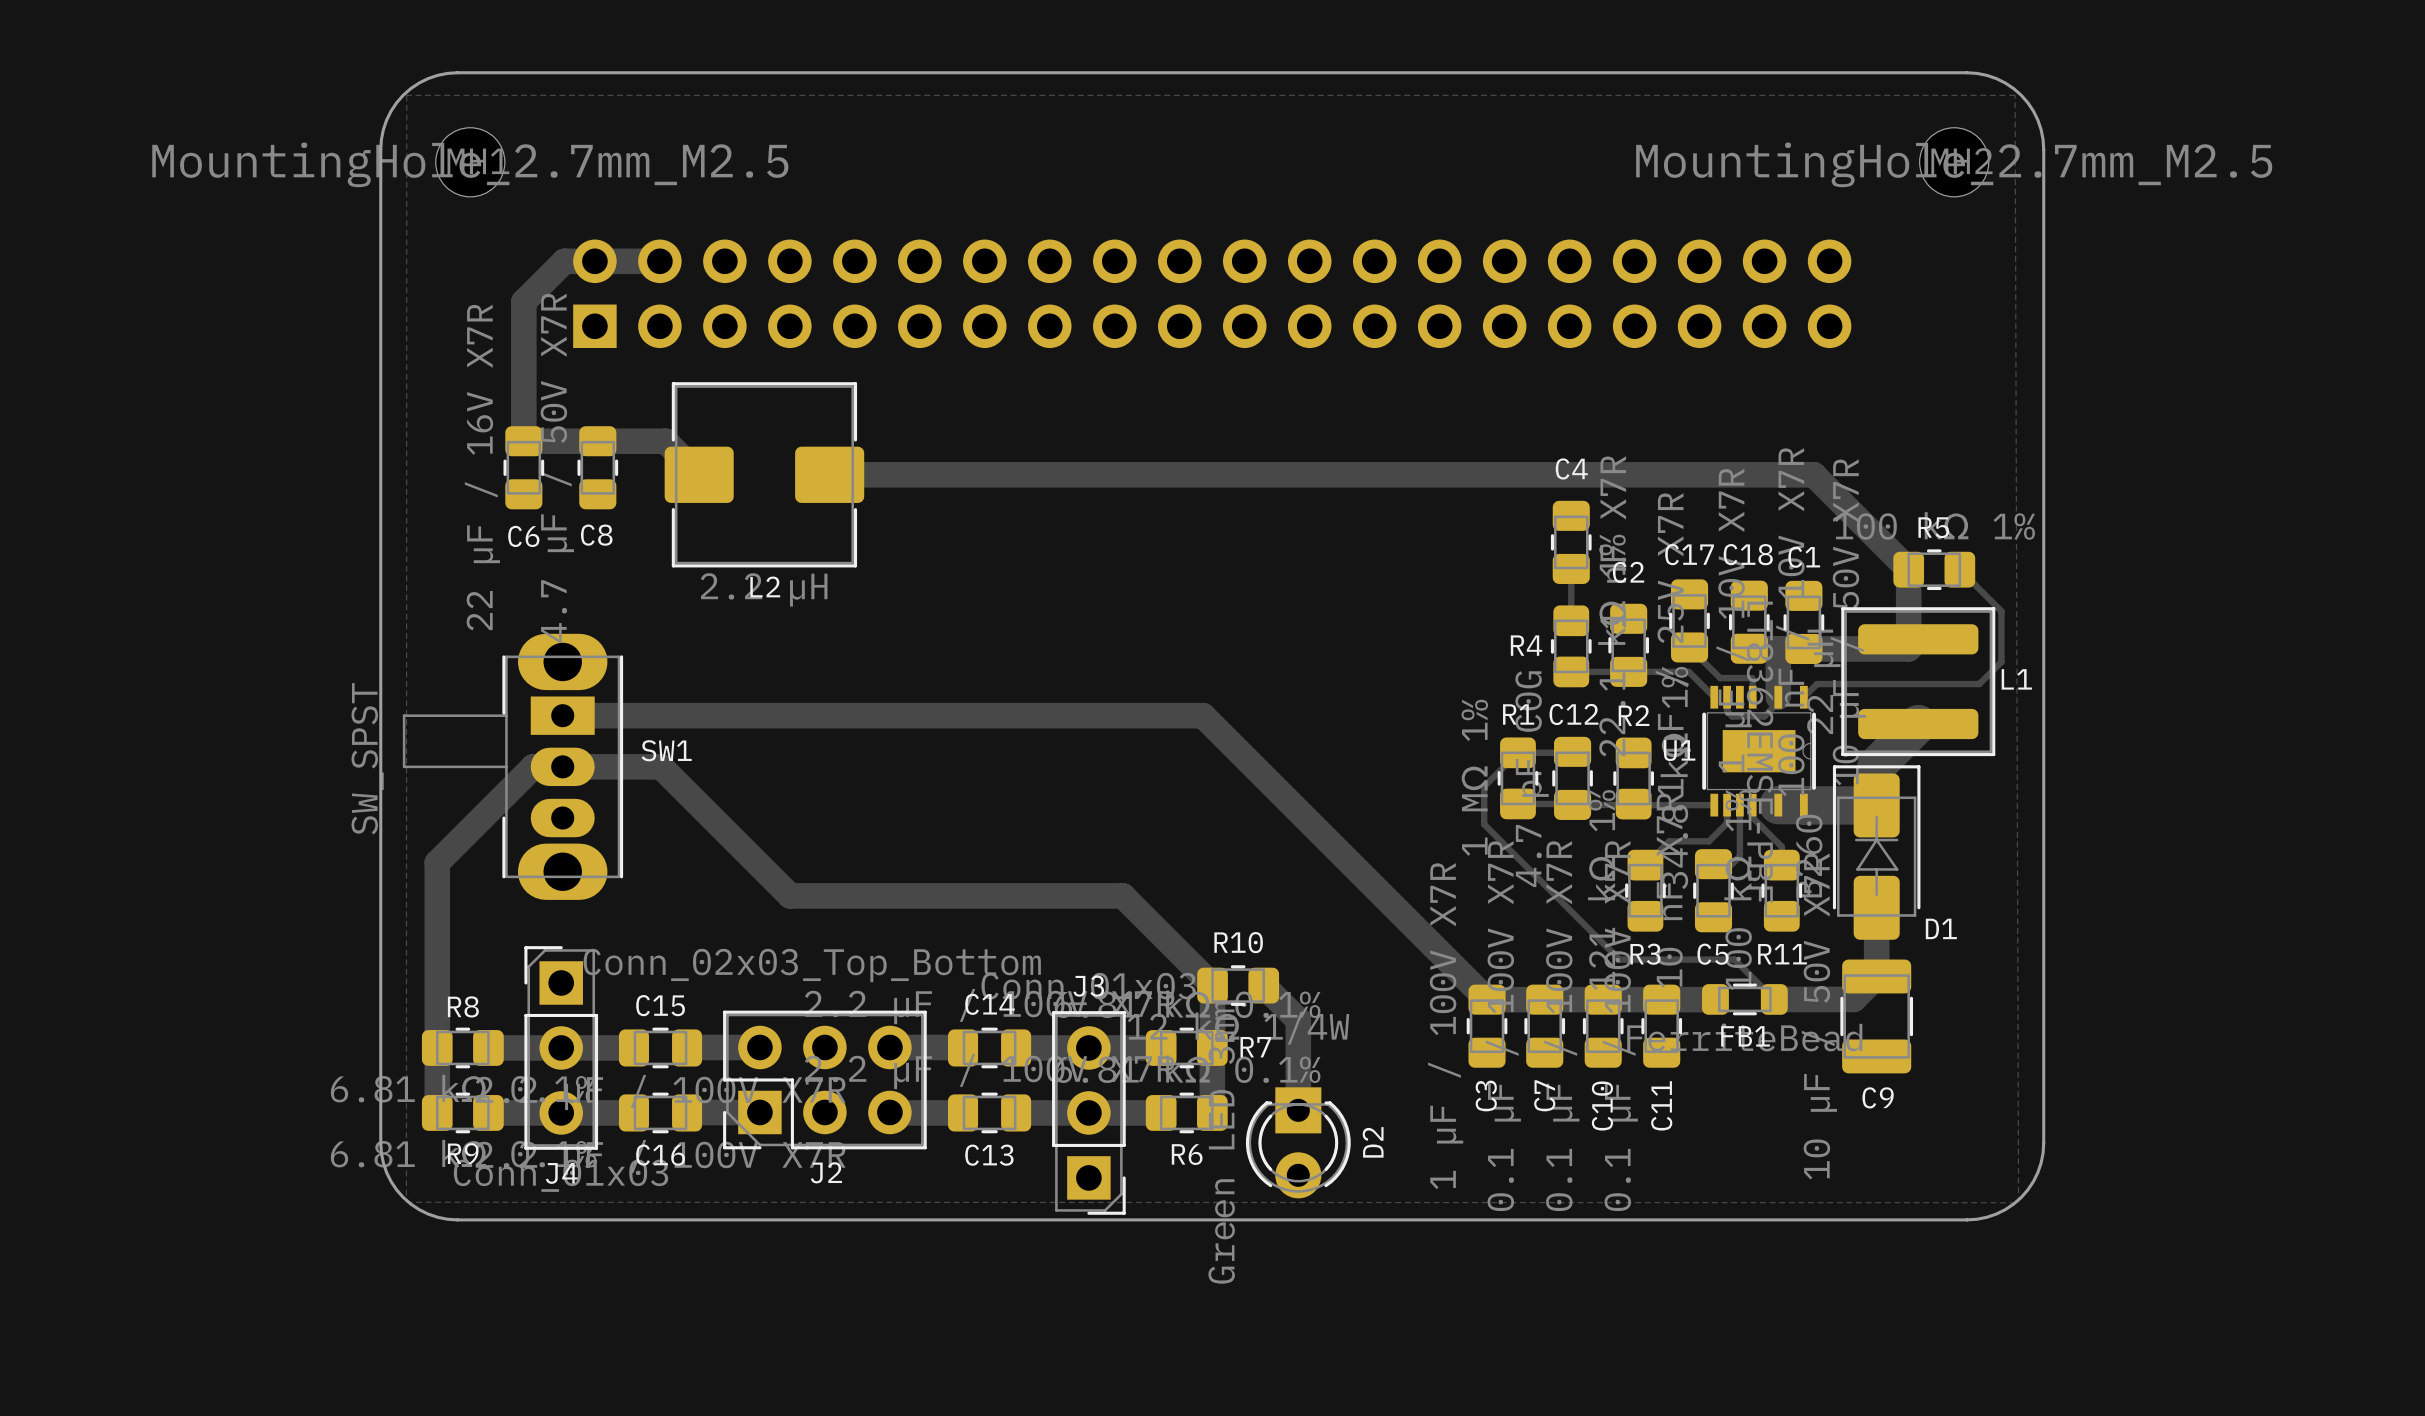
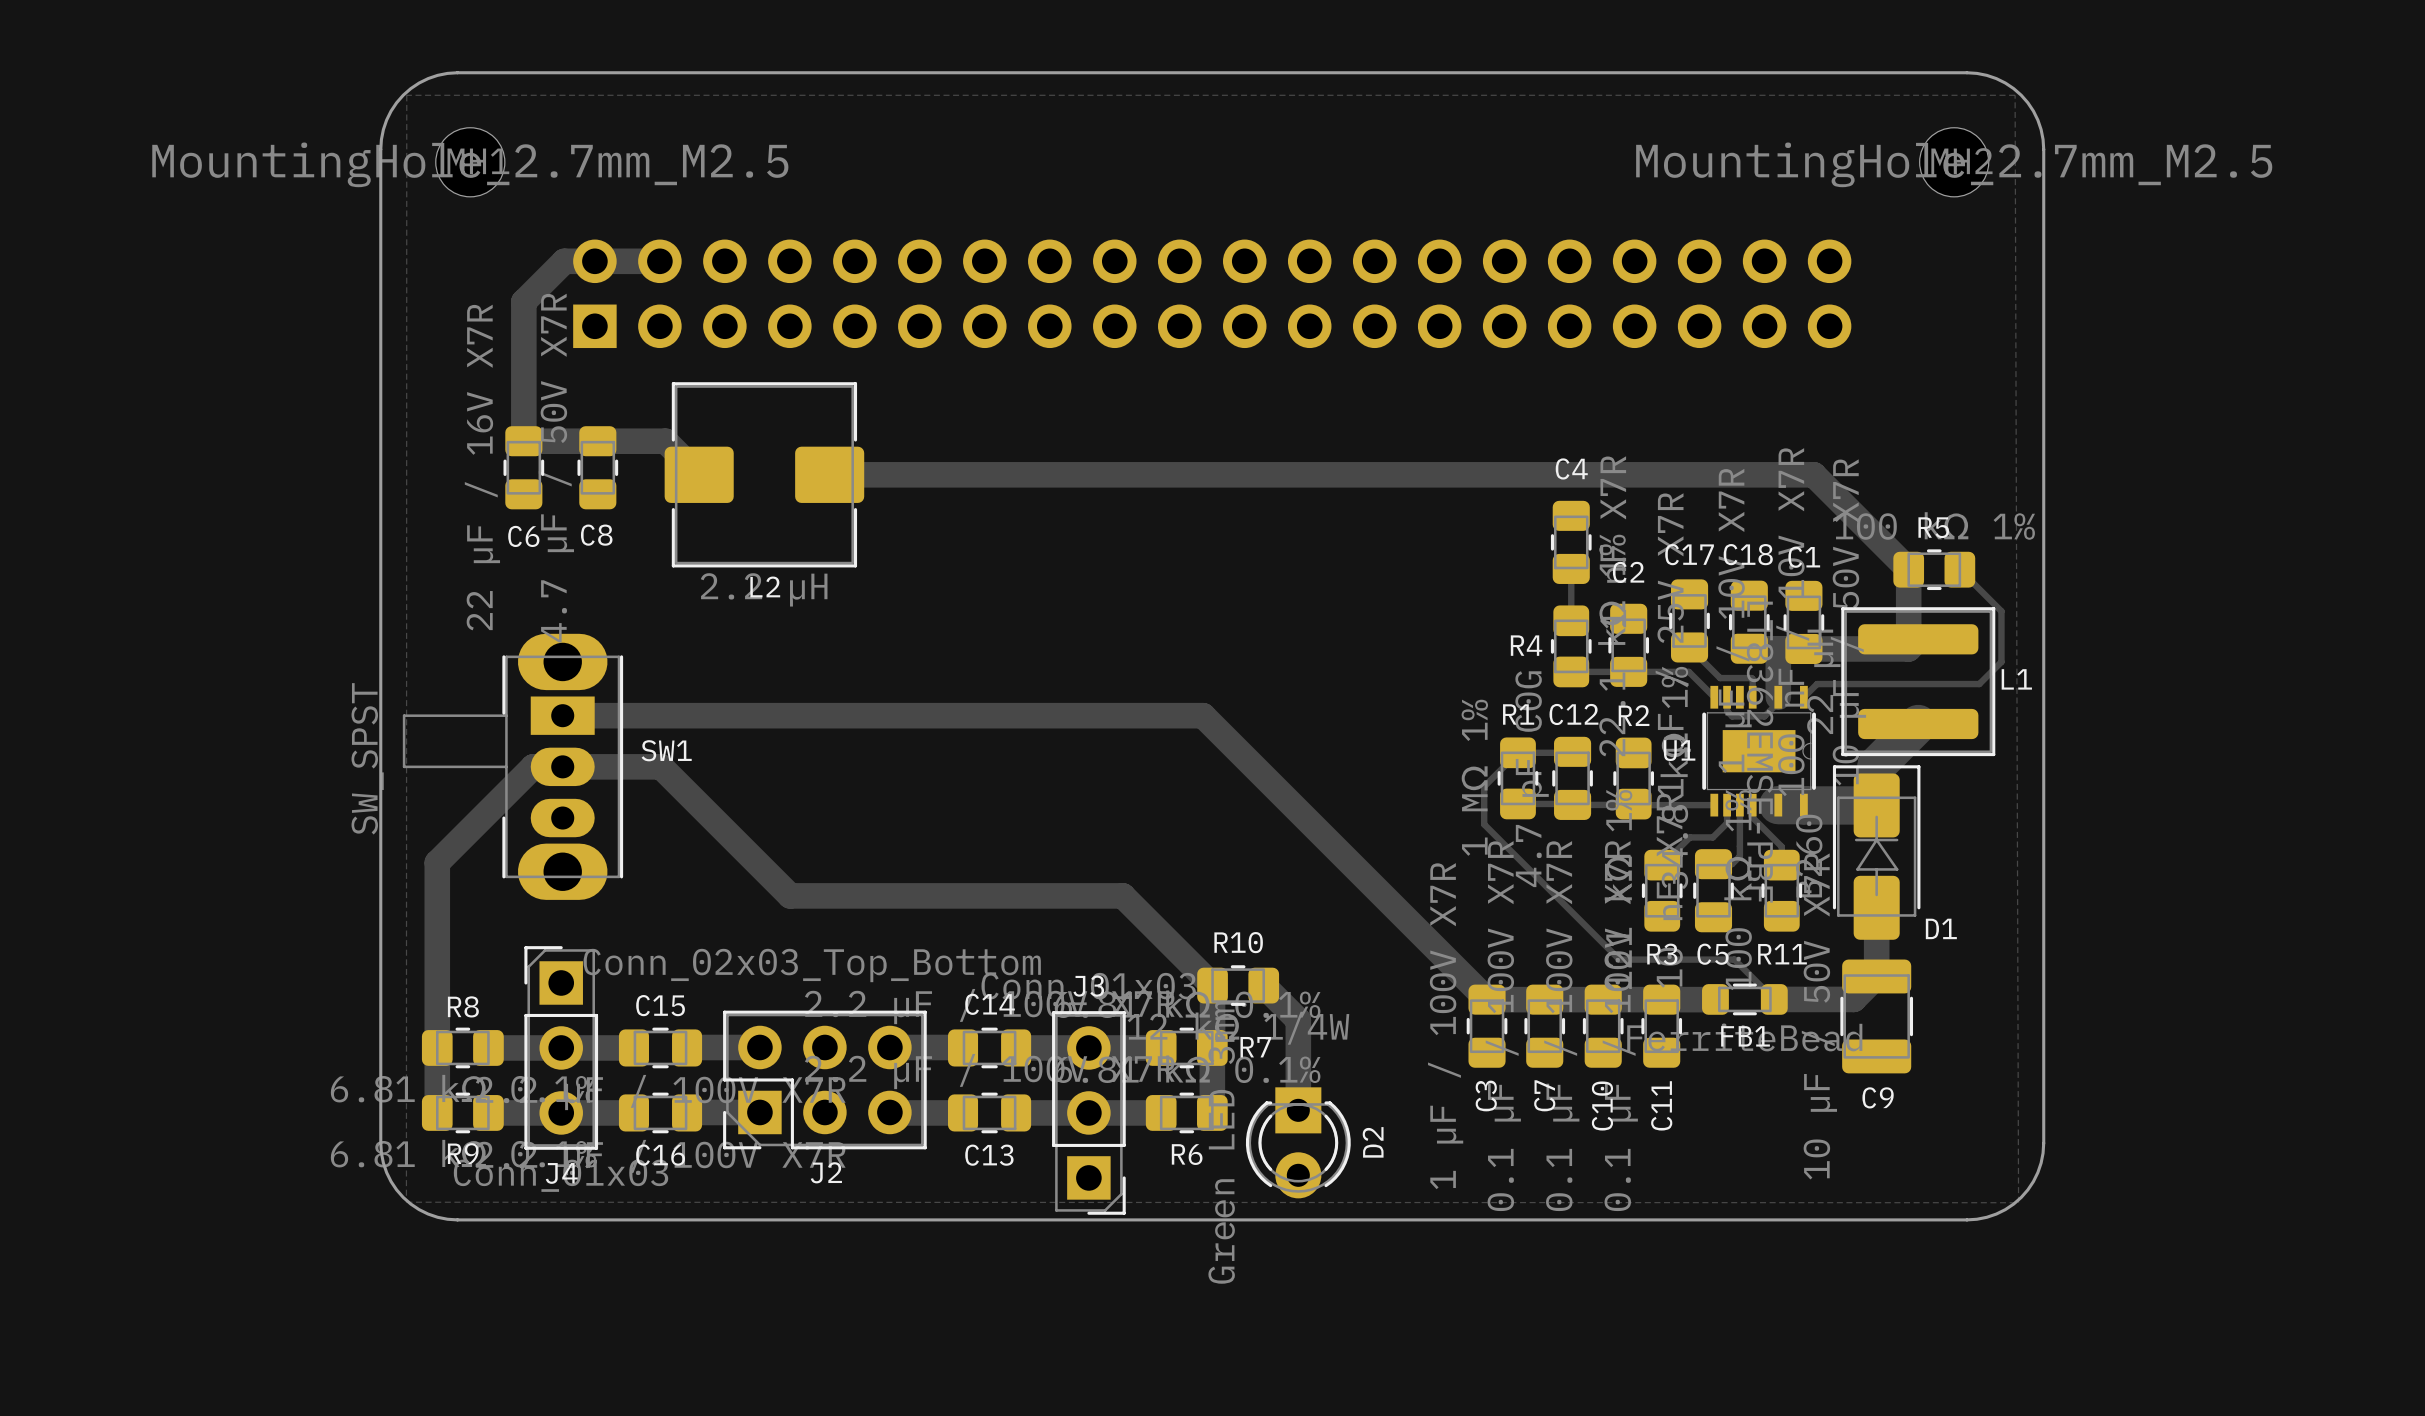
track: (1712, 837) (1708, 841) (1669, 841) (1645, 865) -> (1712, 837) (1689, 837) (1662, 865)
R3 position: (1645, 890) -> (1662, 890)

